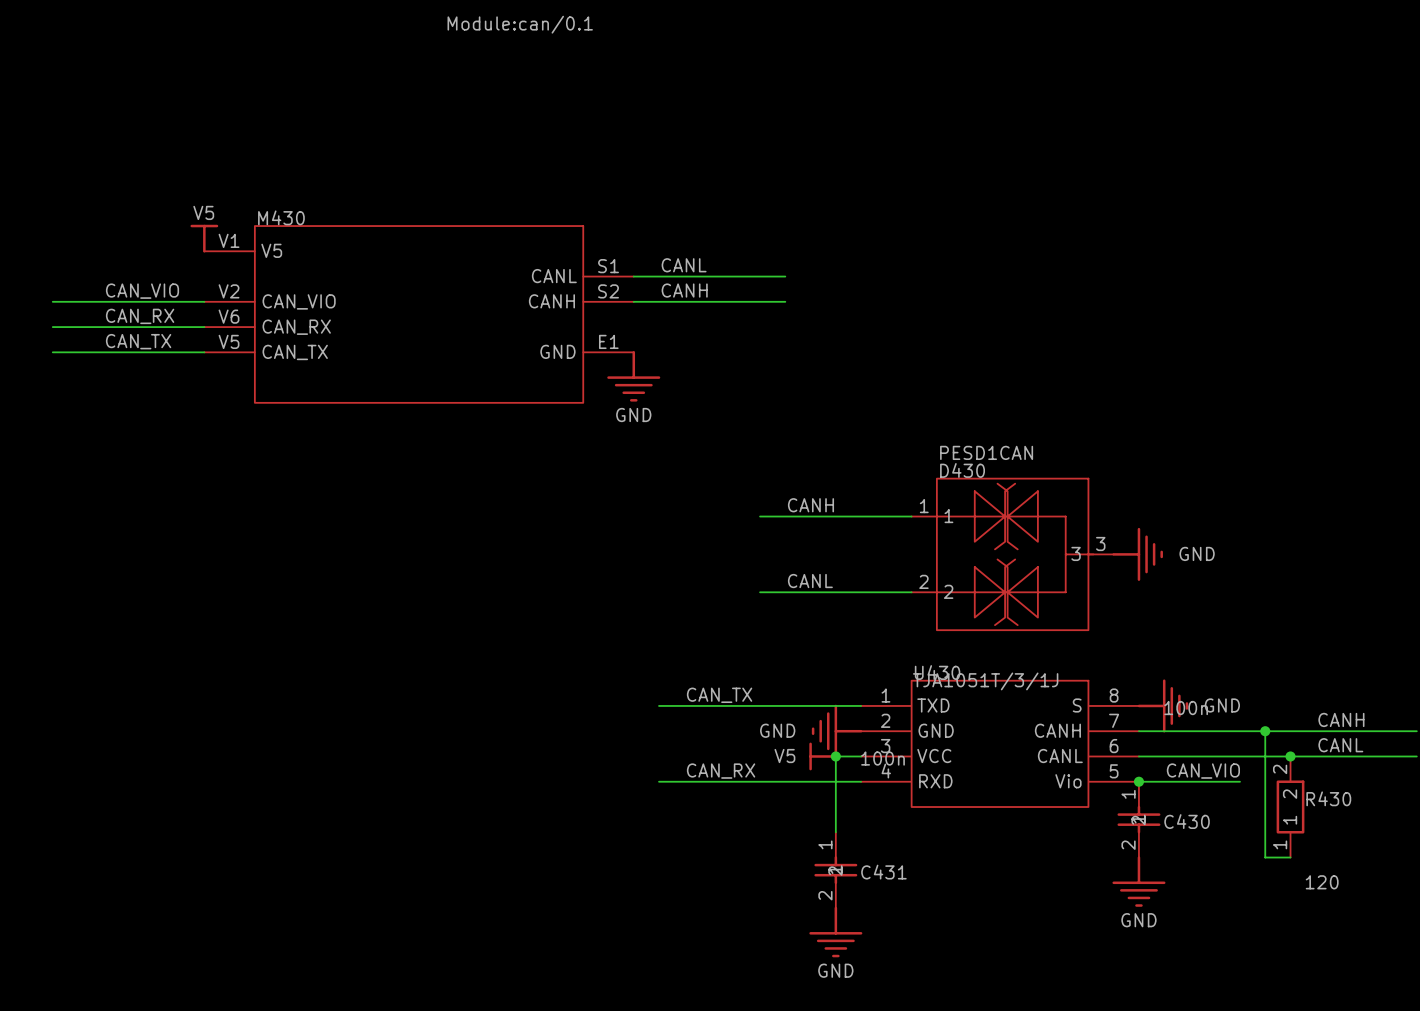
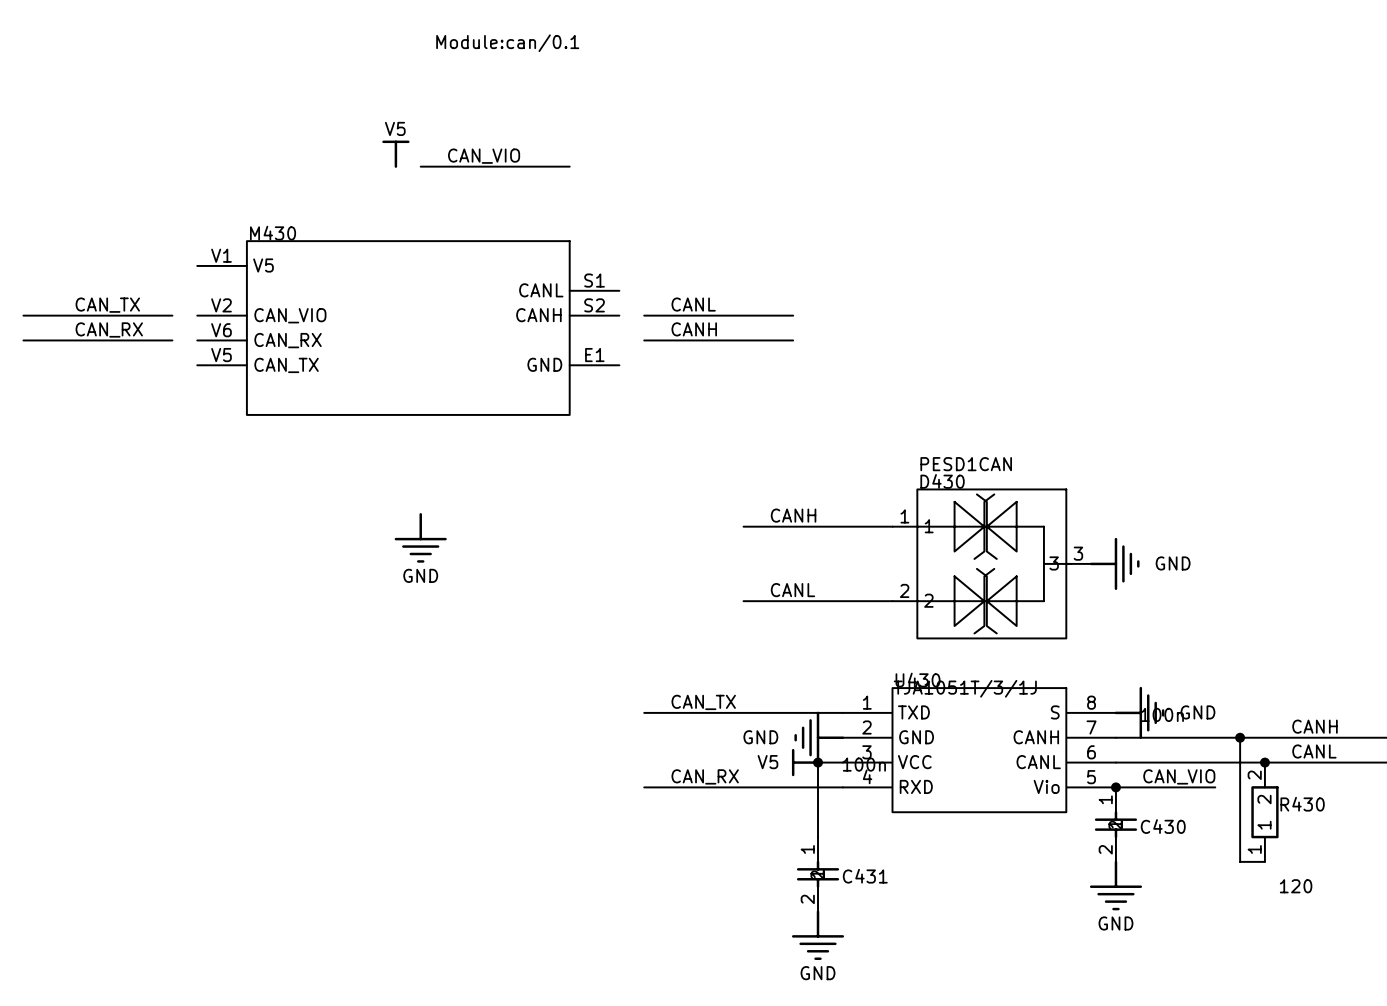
label: none -> CAN_VIO (484, 156)
wire: none -> (420, 166) (569, 166)
power symbol position: V5 (204, 238) -> V5 (395, 154)
label position: CANL (684, 265) -> CANL (693, 304)
wire: (633, 276) (785, 276) -> (644, 340) (793, 340)
label position: CANH (684, 290) -> CANH (694, 329)
label: CAN_VIO (142, 291) -> none
wire: (179, 301) (204, 301) -> (23, 315) (48, 315)
wire: (633, 301) (659, 301) -> (768, 315) (793, 315)
label position: CAN_RX (140, 316) -> CAN_RX (109, 329)
wire: (179, 327) (204, 327) -> (23, 340) (48, 340)
label position: CAN_TX (138, 341) -> CAN_TX (107, 305)
wire: (52, 352) (204, 352) -> none
power symbol: GND (633, 376) -> none
power symbol: none -> GND (420, 537)

